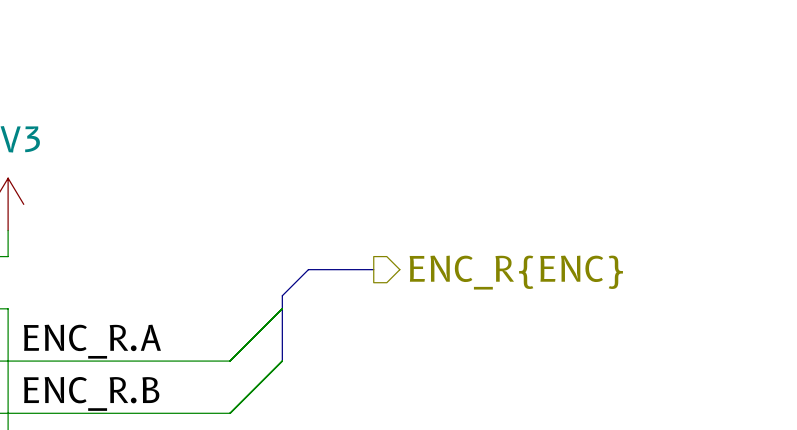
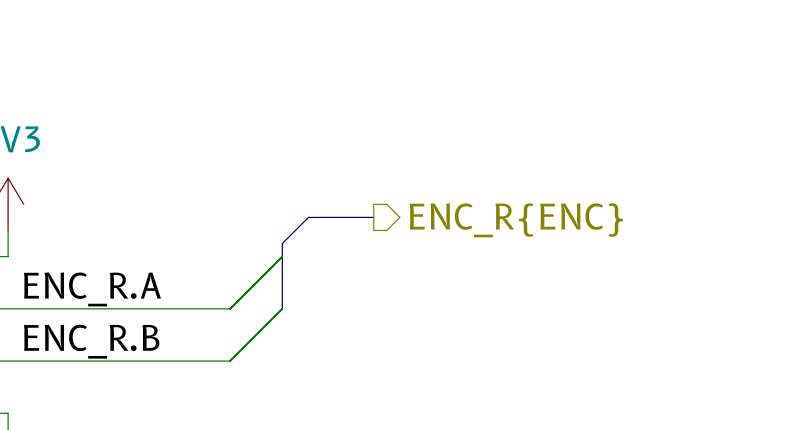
bus: (373, 269) (308, 269) (282, 295) -> (373, 217) (308, 217) (282, 243) (282, 295)
hierarchical label position: ENC_R{ENC} (516, 272) -> ENC_R{ENC} (516, 220)
label: none -> ENC_R.A (92, 289)
wire: (8, 308) (8, 413) (230, 413) (282, 361) -> (8, 308) (230, 308) (282, 256)
bus: (282, 308) (282, 361) -> none
label: ENC_R.A (92, 341) -> ENC_R.B (91, 341)
label: ENC_R.B (91, 393) -> none

